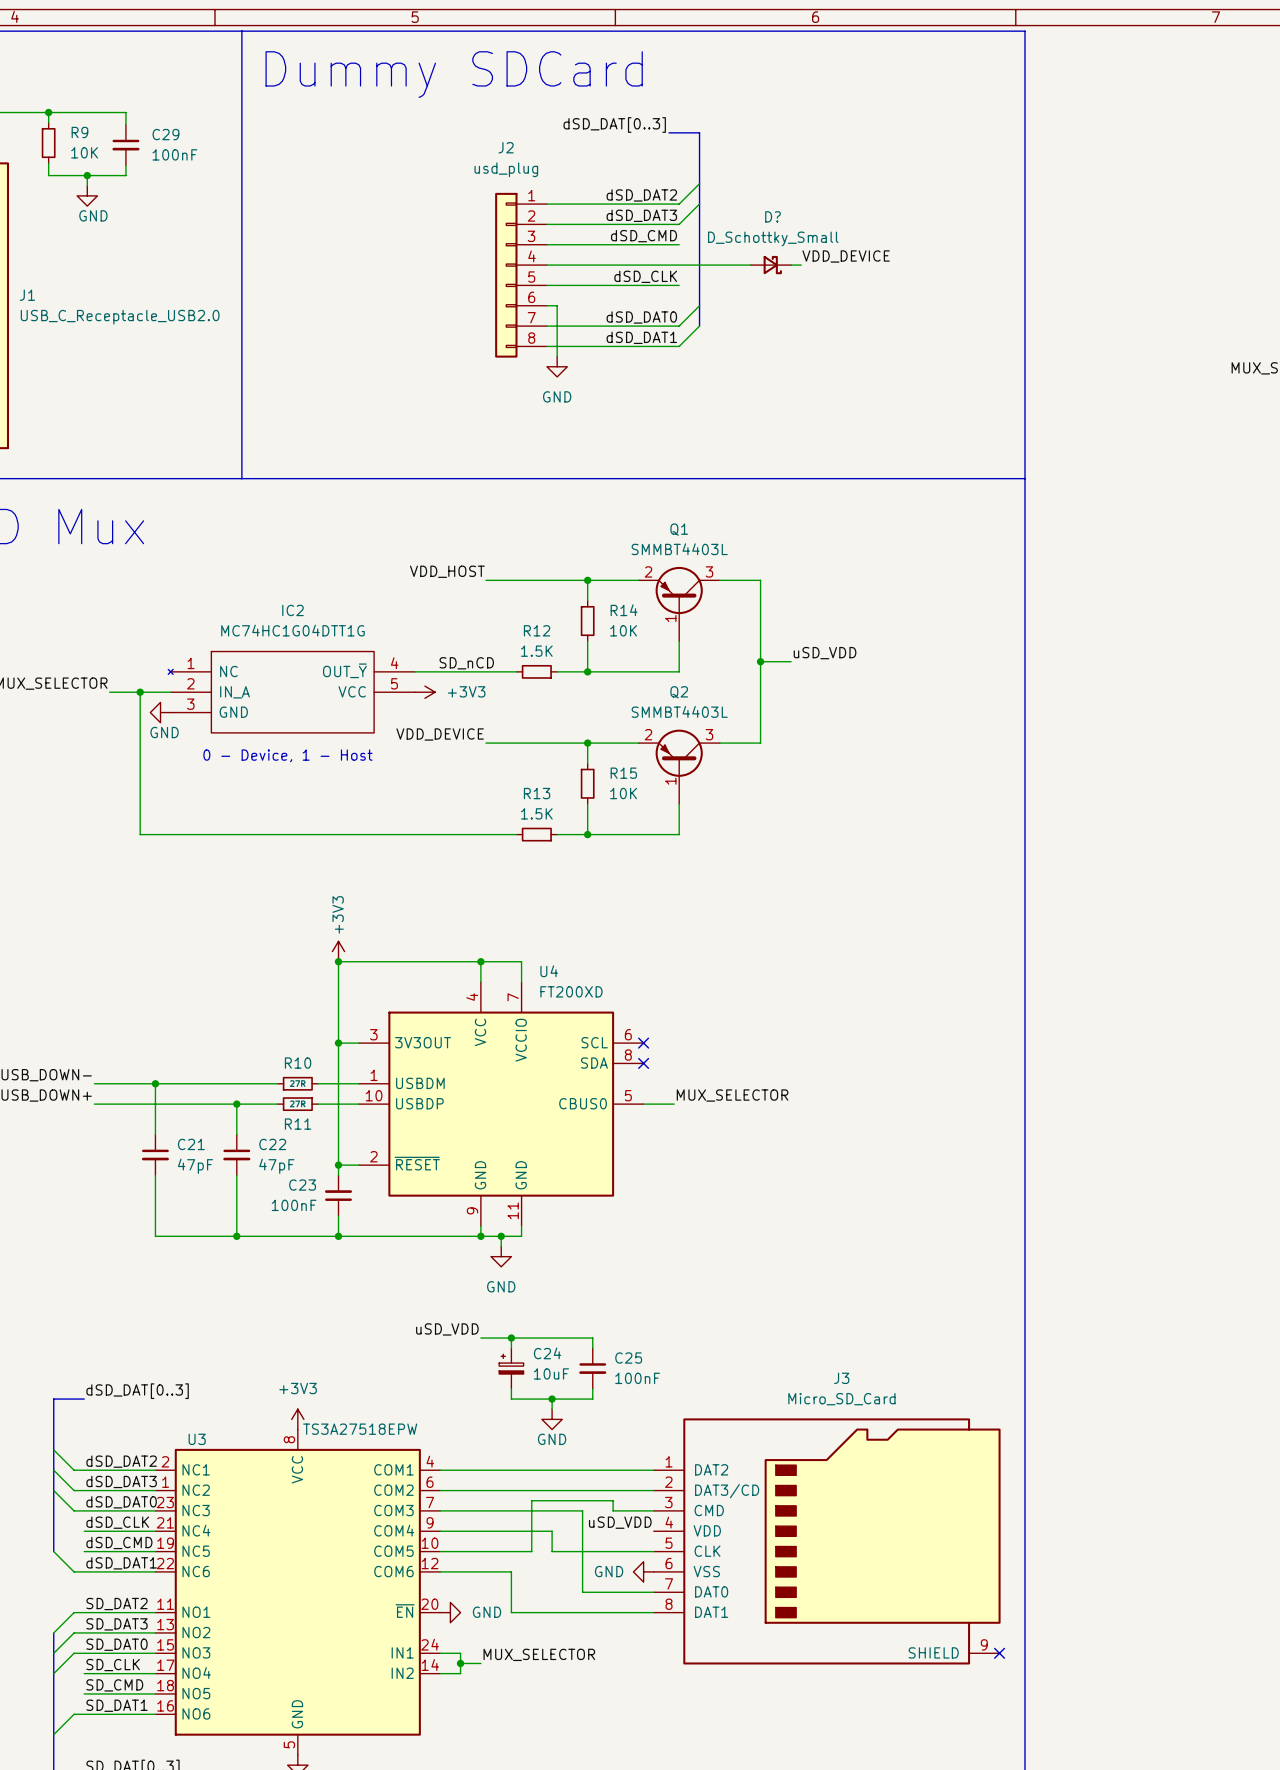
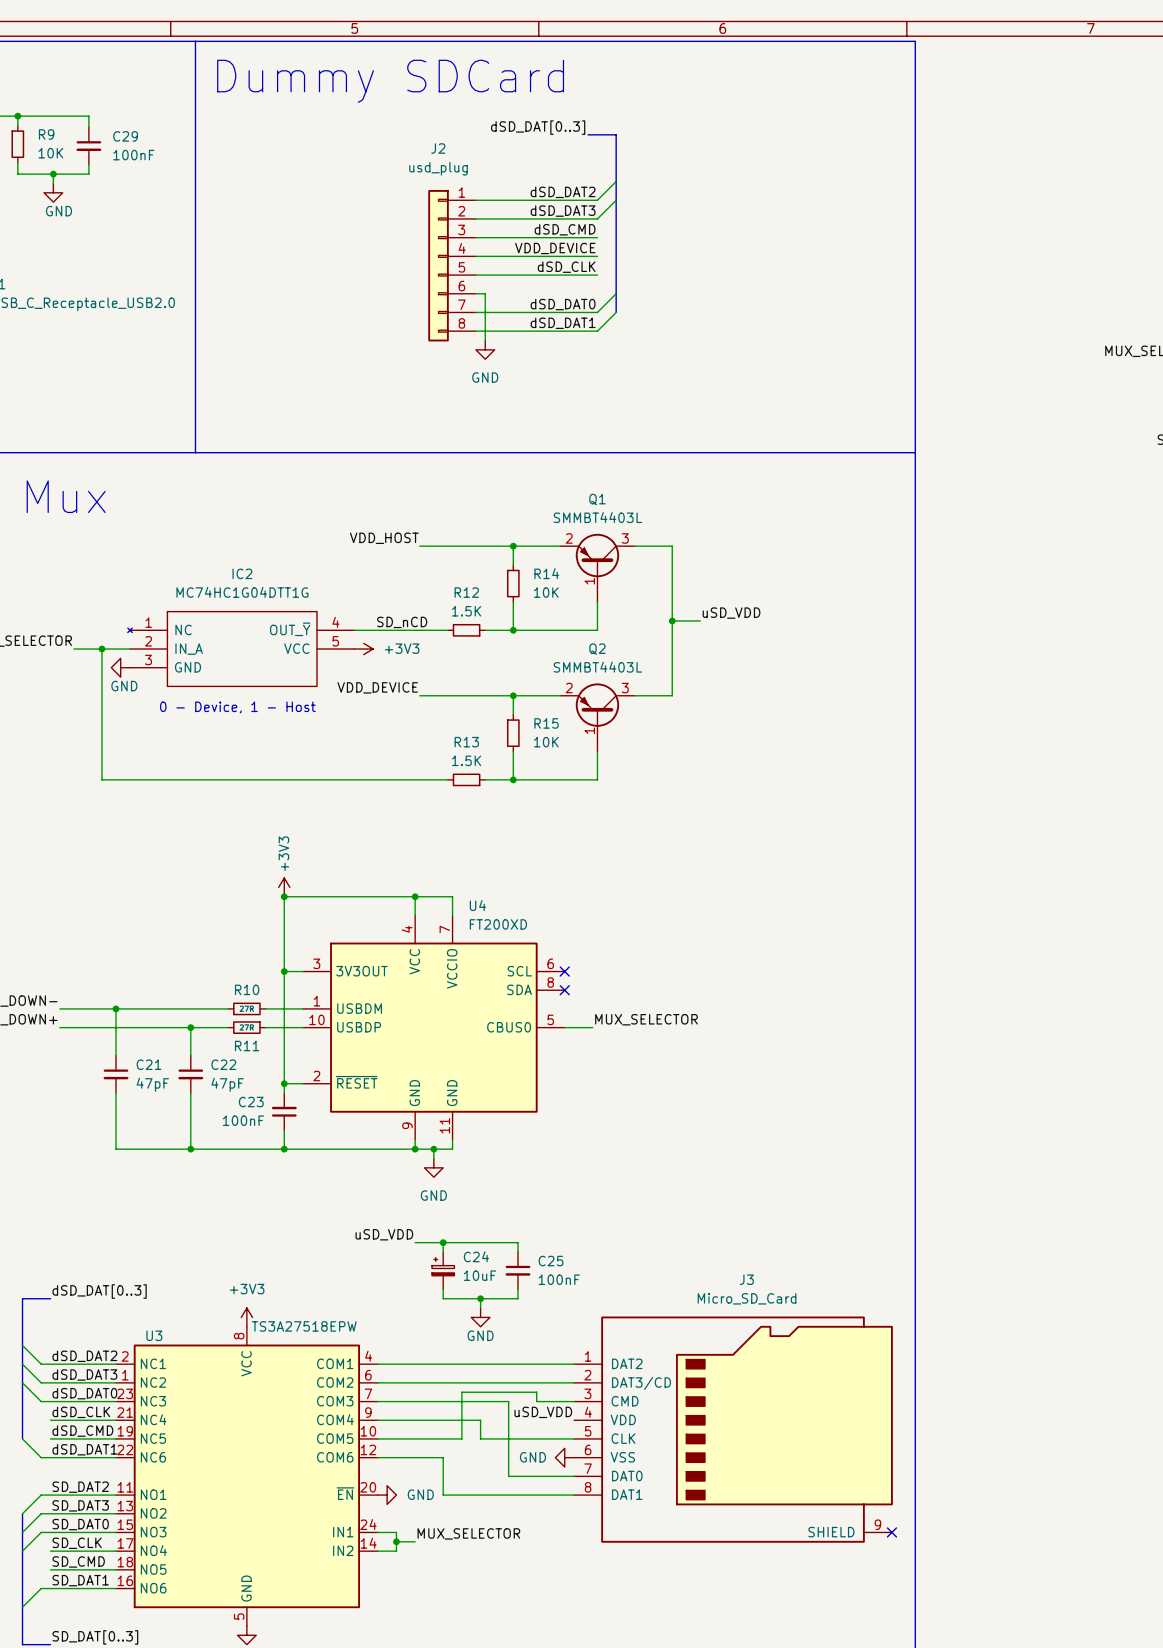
label position: VDD_DEVICE (846, 256) -> VDD_DEVICE (555, 248)
wire: (679, 265) (750, 265) -> none
D?: D_Schottky_Small (770, 265) -> none
wire: (791, 265) (801, 265) -> none

